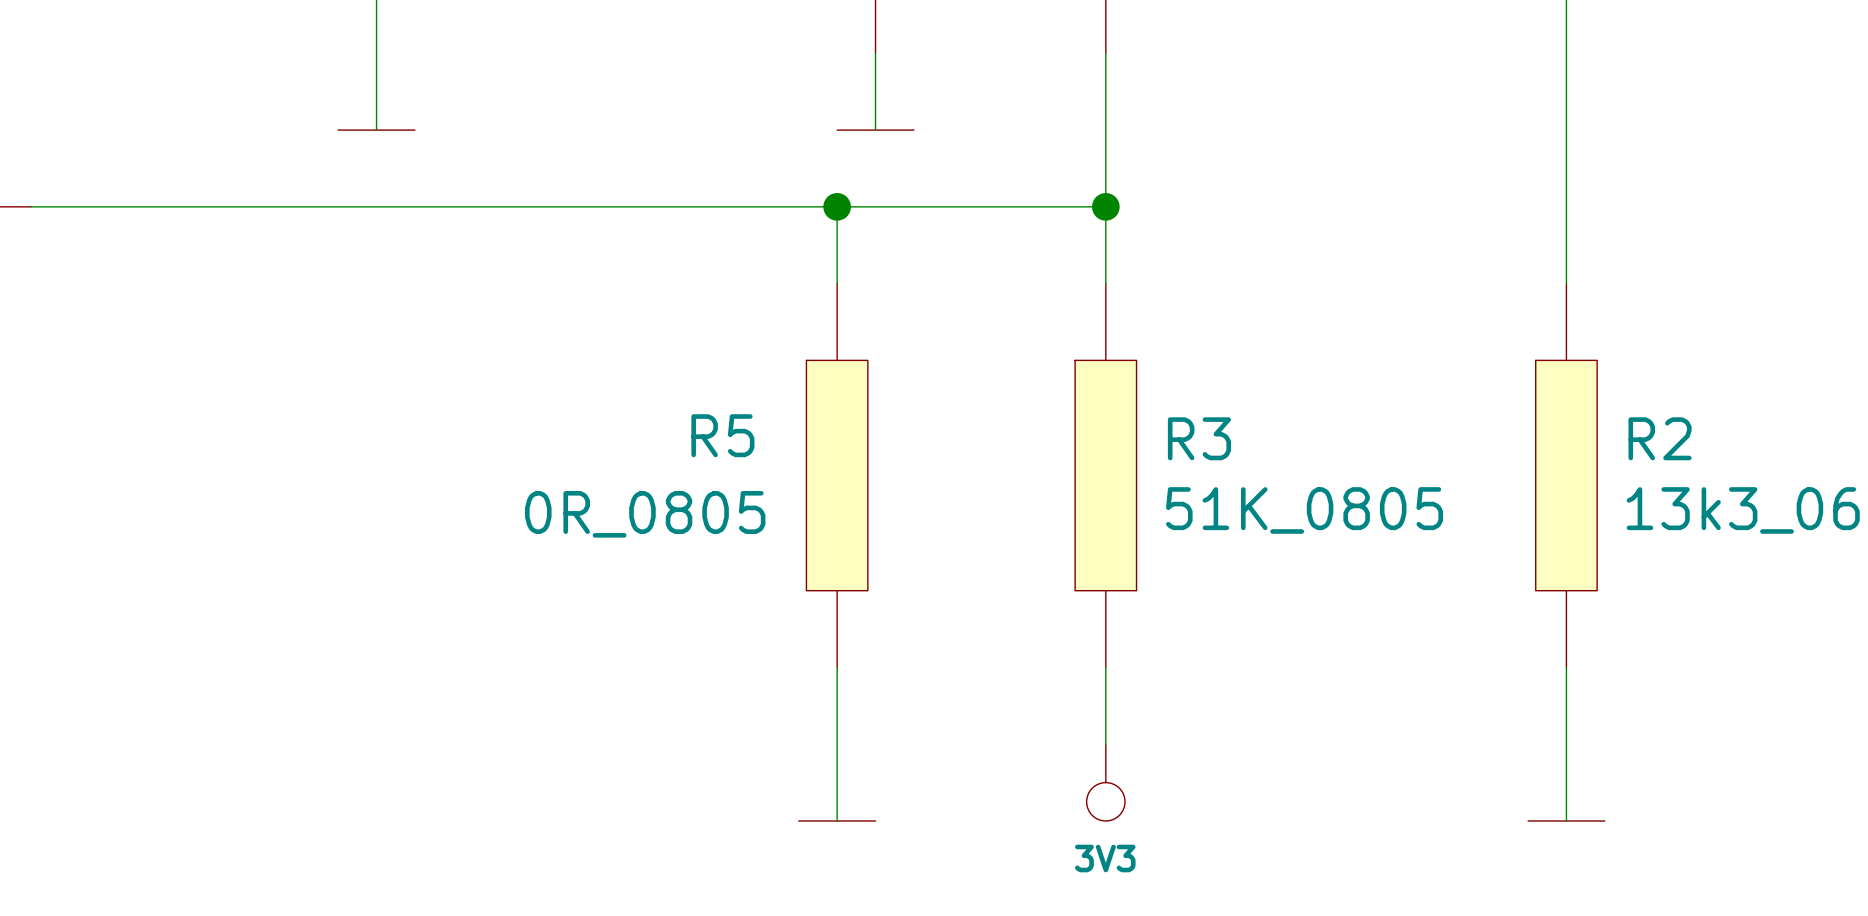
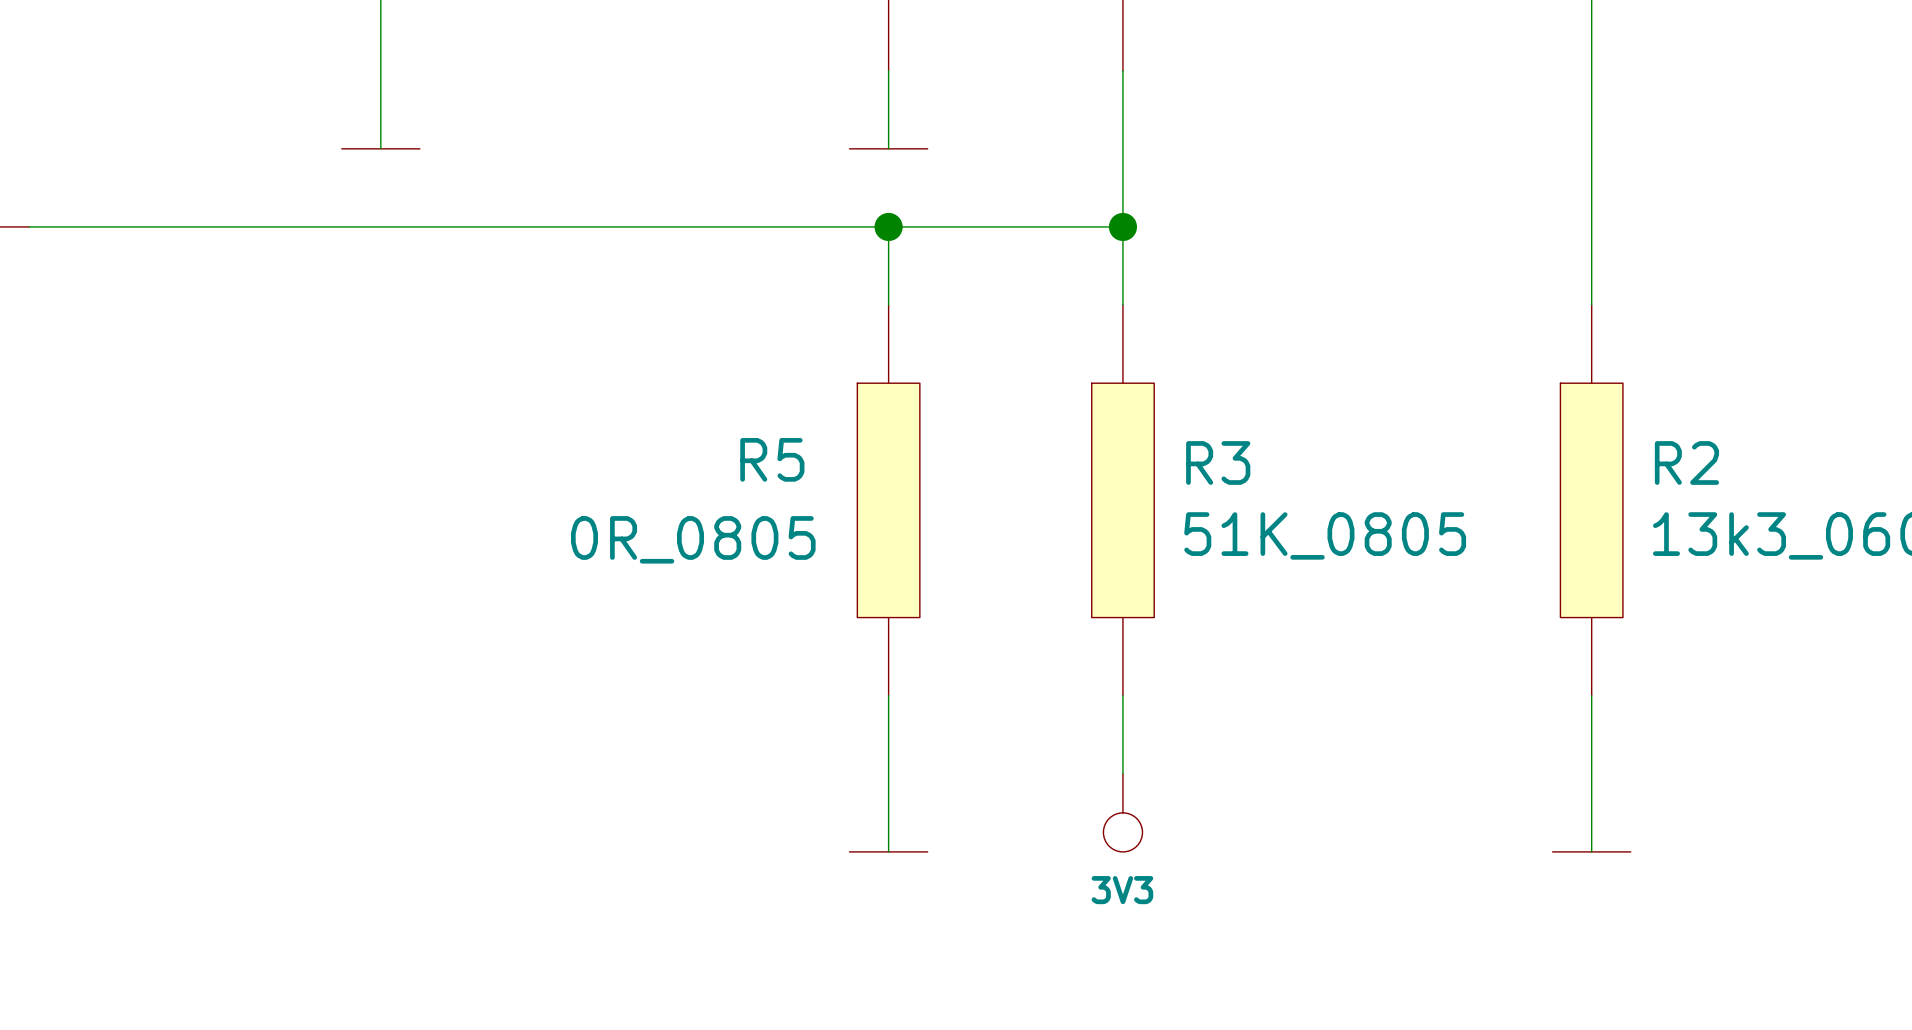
wire: (837, 206) (837, 283) -> (888, 226) (888, 305)
junction position: (837, 206) -> (888, 226)
R5 position: (837, 475) -> (888, 500)
wire: (837, 667) (837, 820) -> (888, 695) (888, 851)
power symbol position: (837, 820) -> (888, 851)

